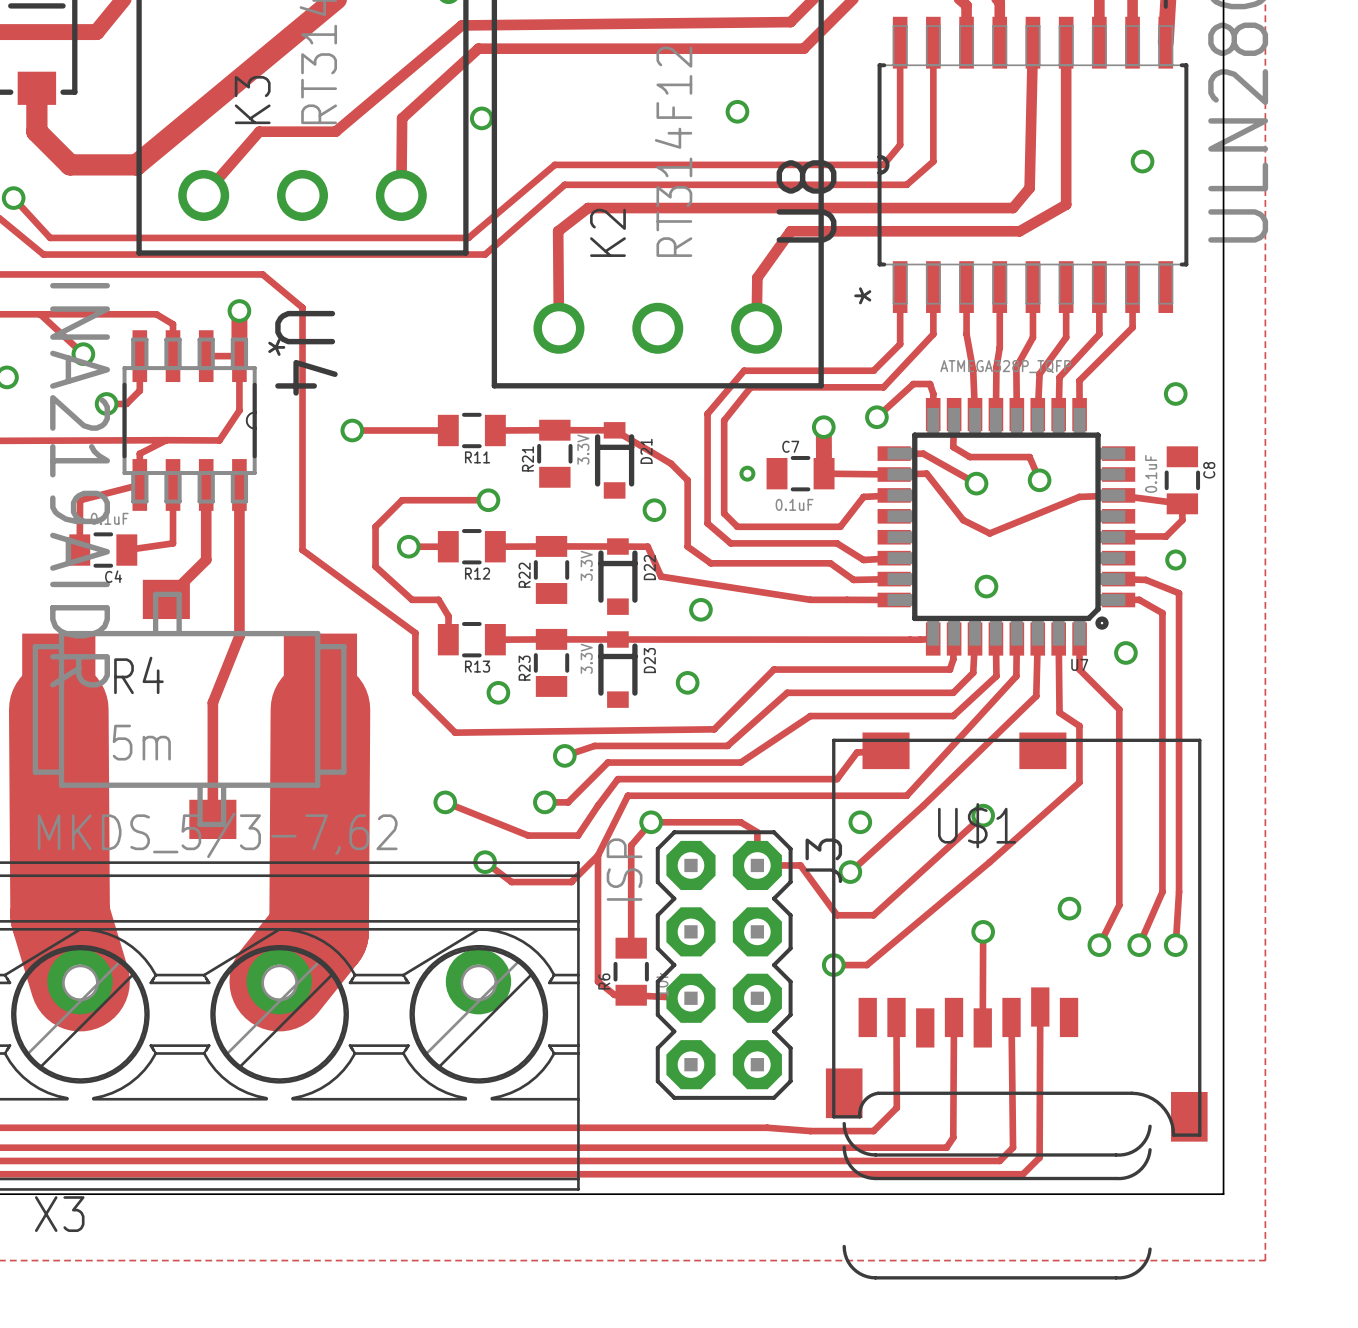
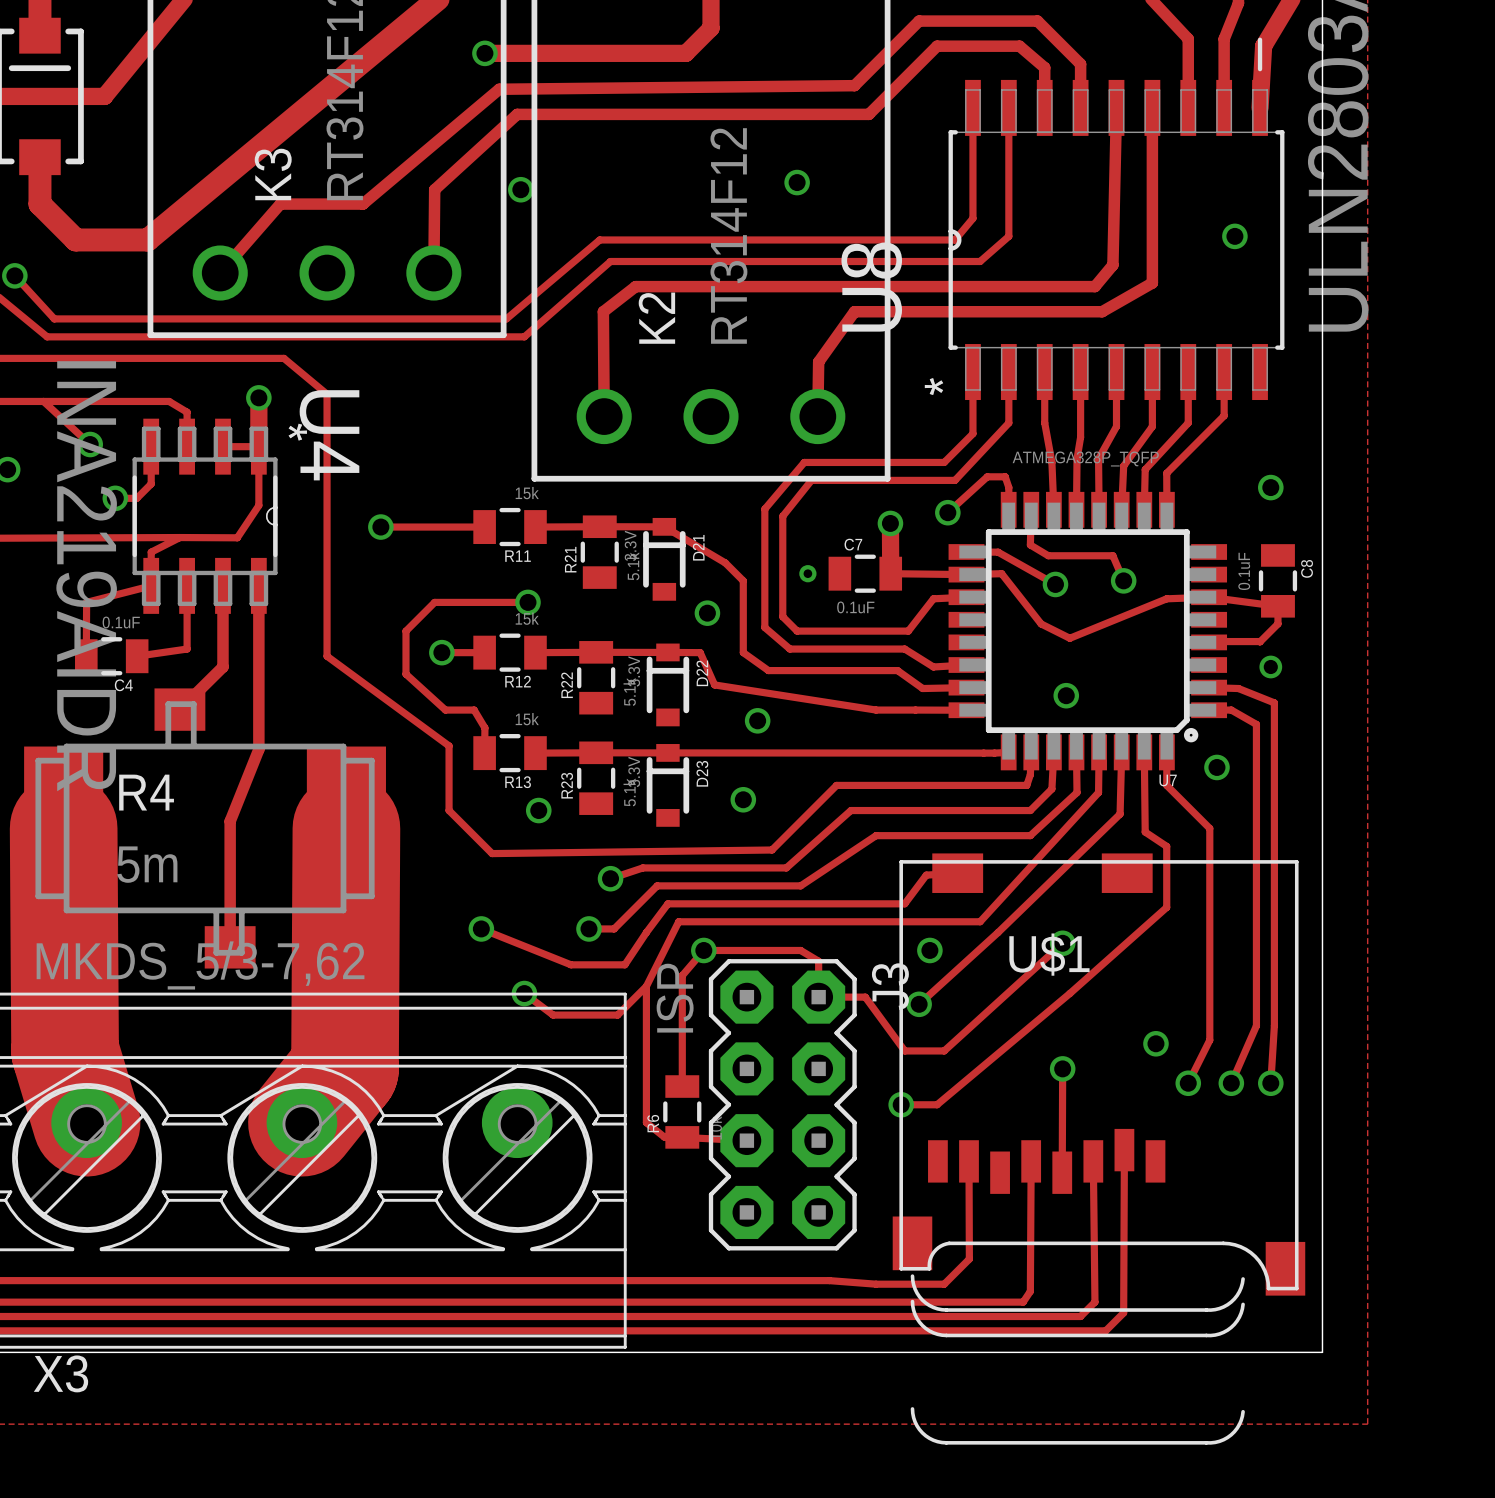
R11 value: none -> 15k (527, 493)
R21 value: none -> 5.1k (633, 566)
R12 value: none -> 15k (527, 618)
R22 value: none -> 5.1k (629, 691)
R13 value: none -> 15k (527, 719)
R23 value: none -> 5.1k (629, 792)

